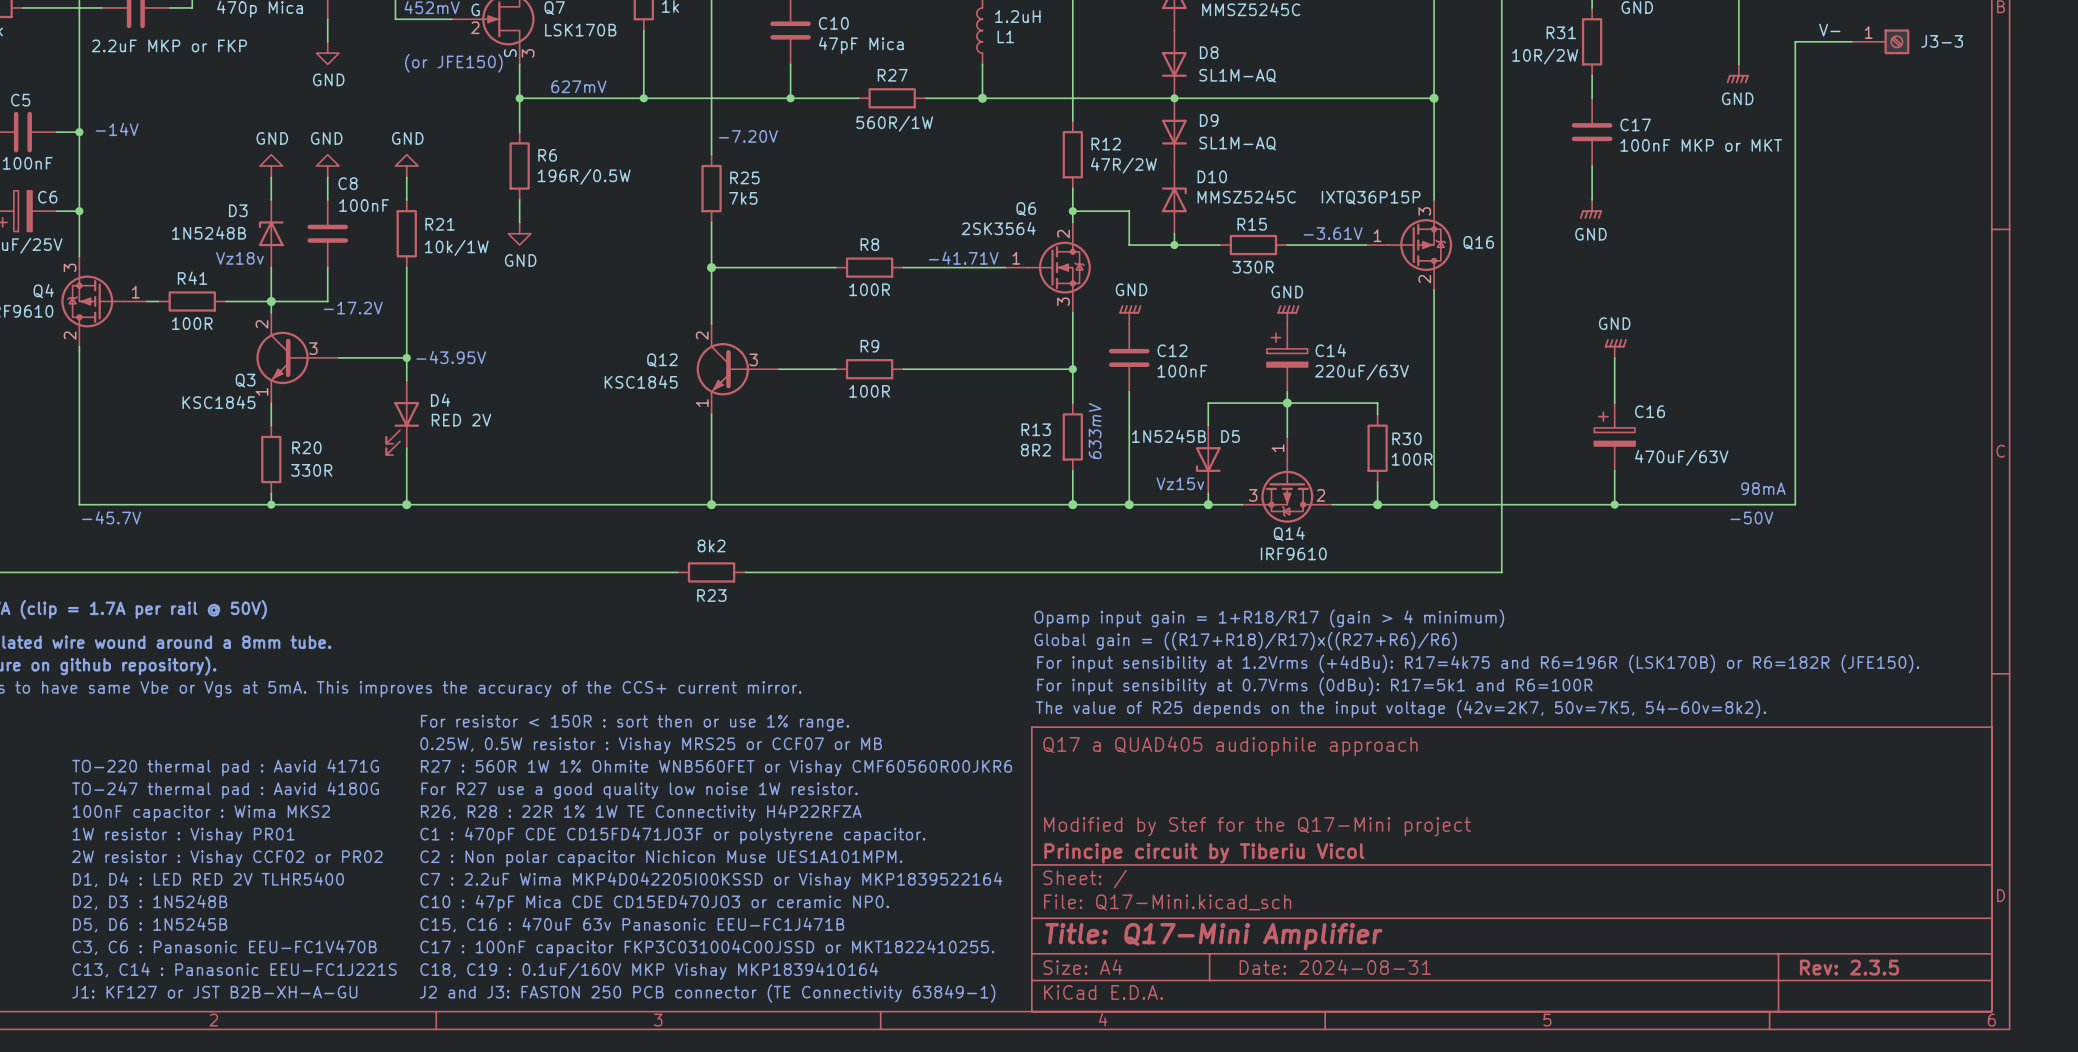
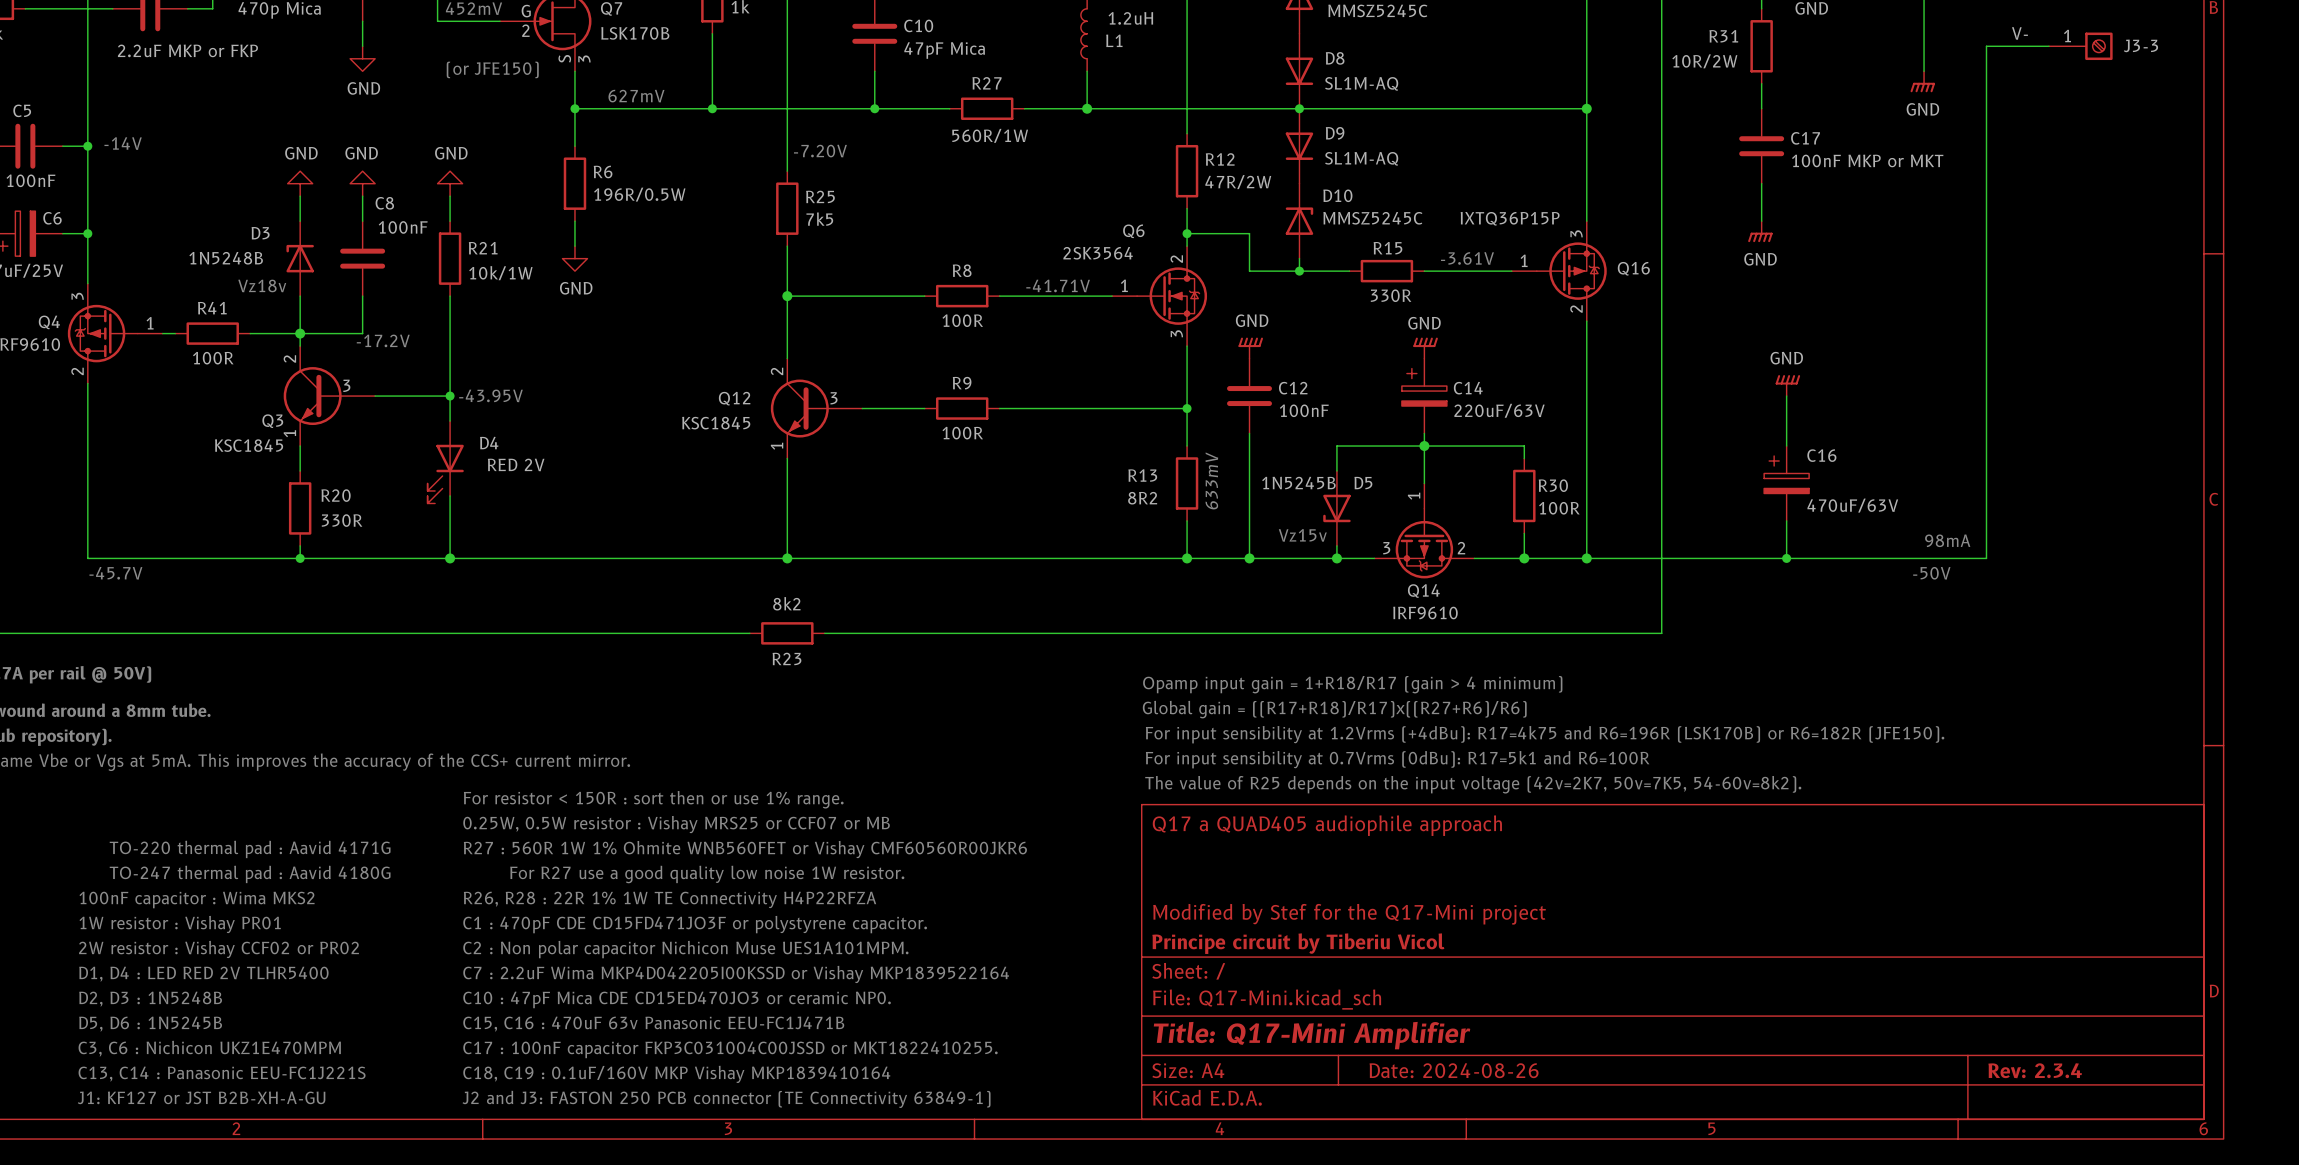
text: C3, C6 : Panasonic EEU-FC1V470B (224, 947) -> C3, C6 : Nichicon UKZ1E470MPM (209, 1048)
title block: Date: 2024-08-31 (1335, 967) -> Date: 2024-08-26 (1454, 1070)
title block: Rev: 2.3.5 (1849, 967) -> Rev: 2.3.4 (2035, 1070)

